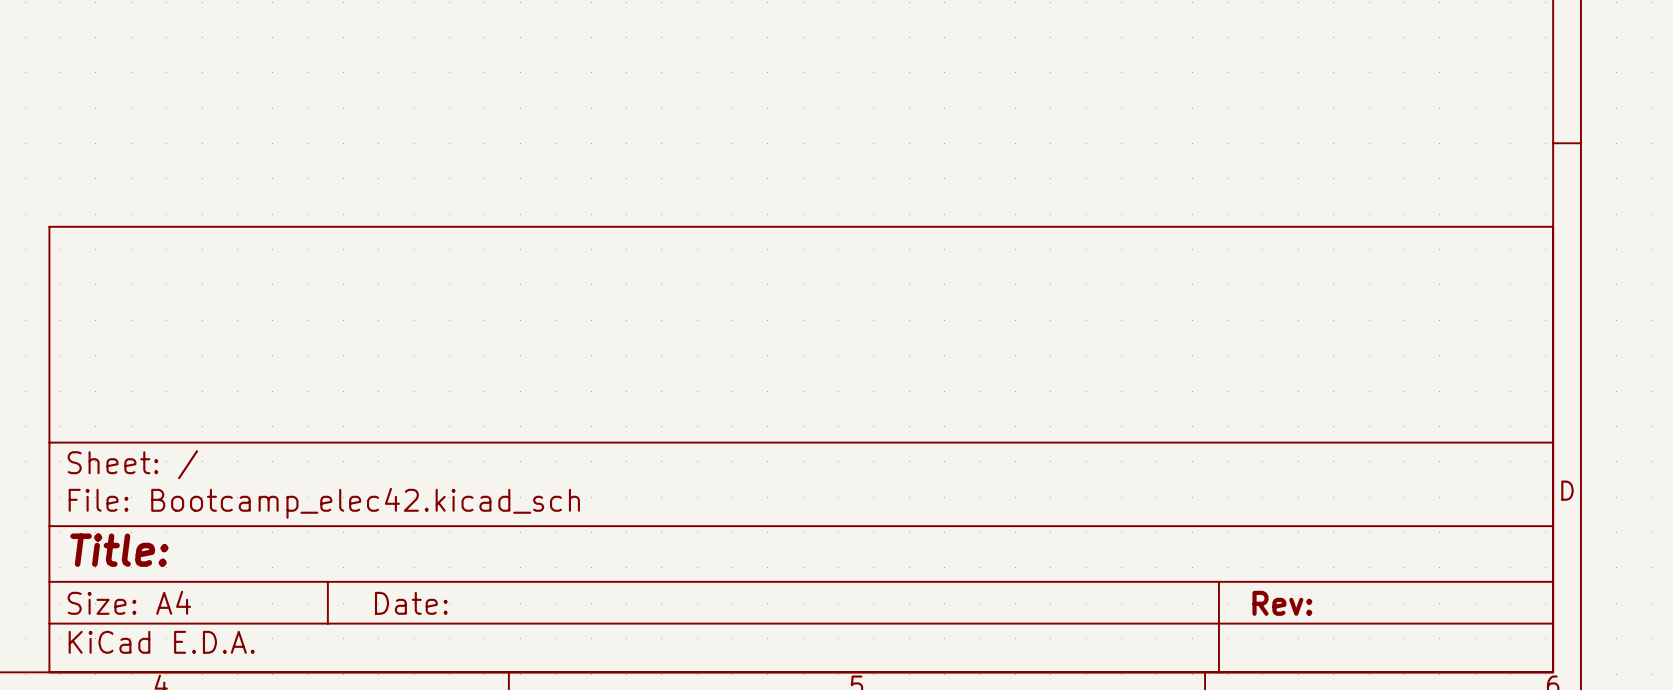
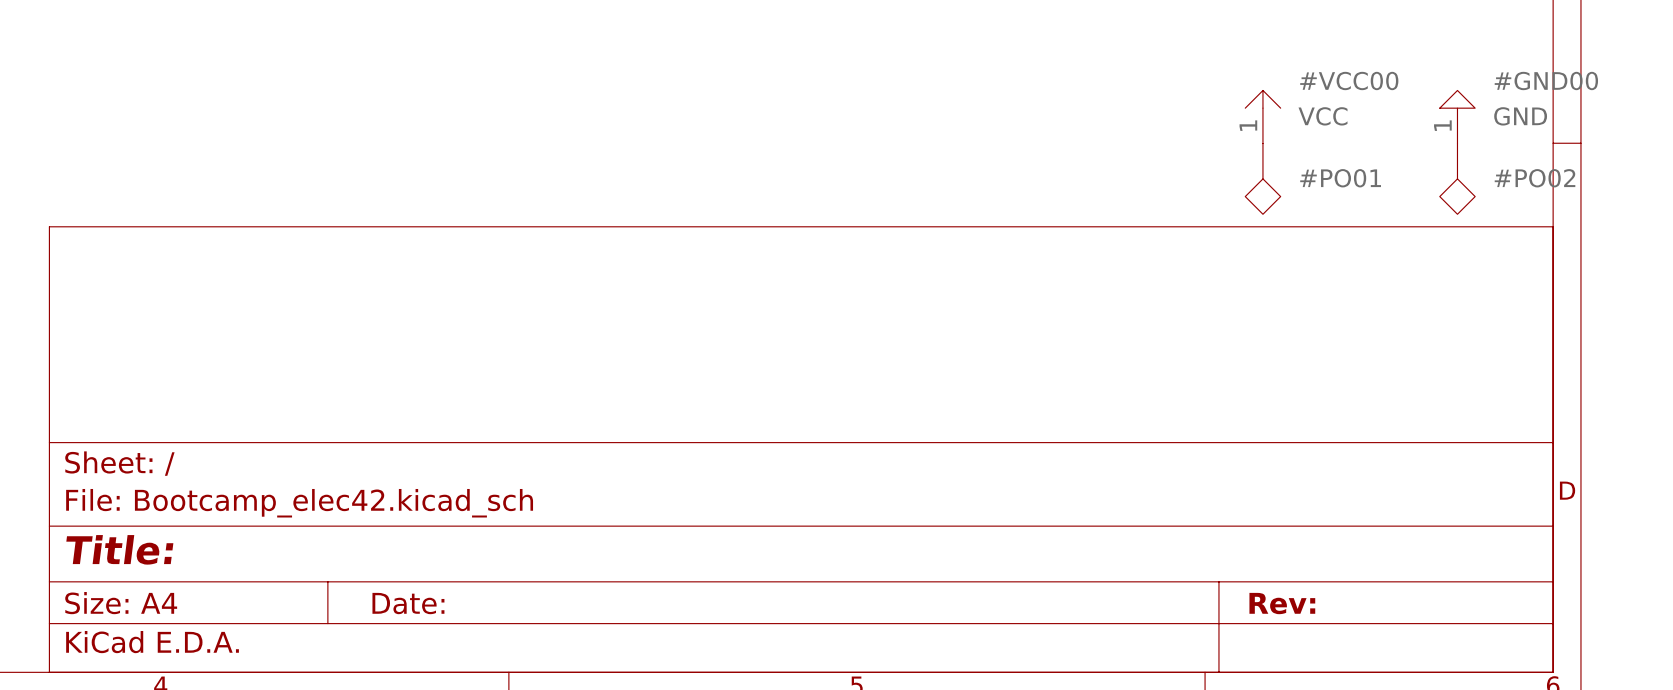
#VCC00: none -> VCC (1262, 117)
#GND00: none -> GND (1457, 117)
#PO01: none -> (1262, 178)
#PO02: none -> (1457, 178)

